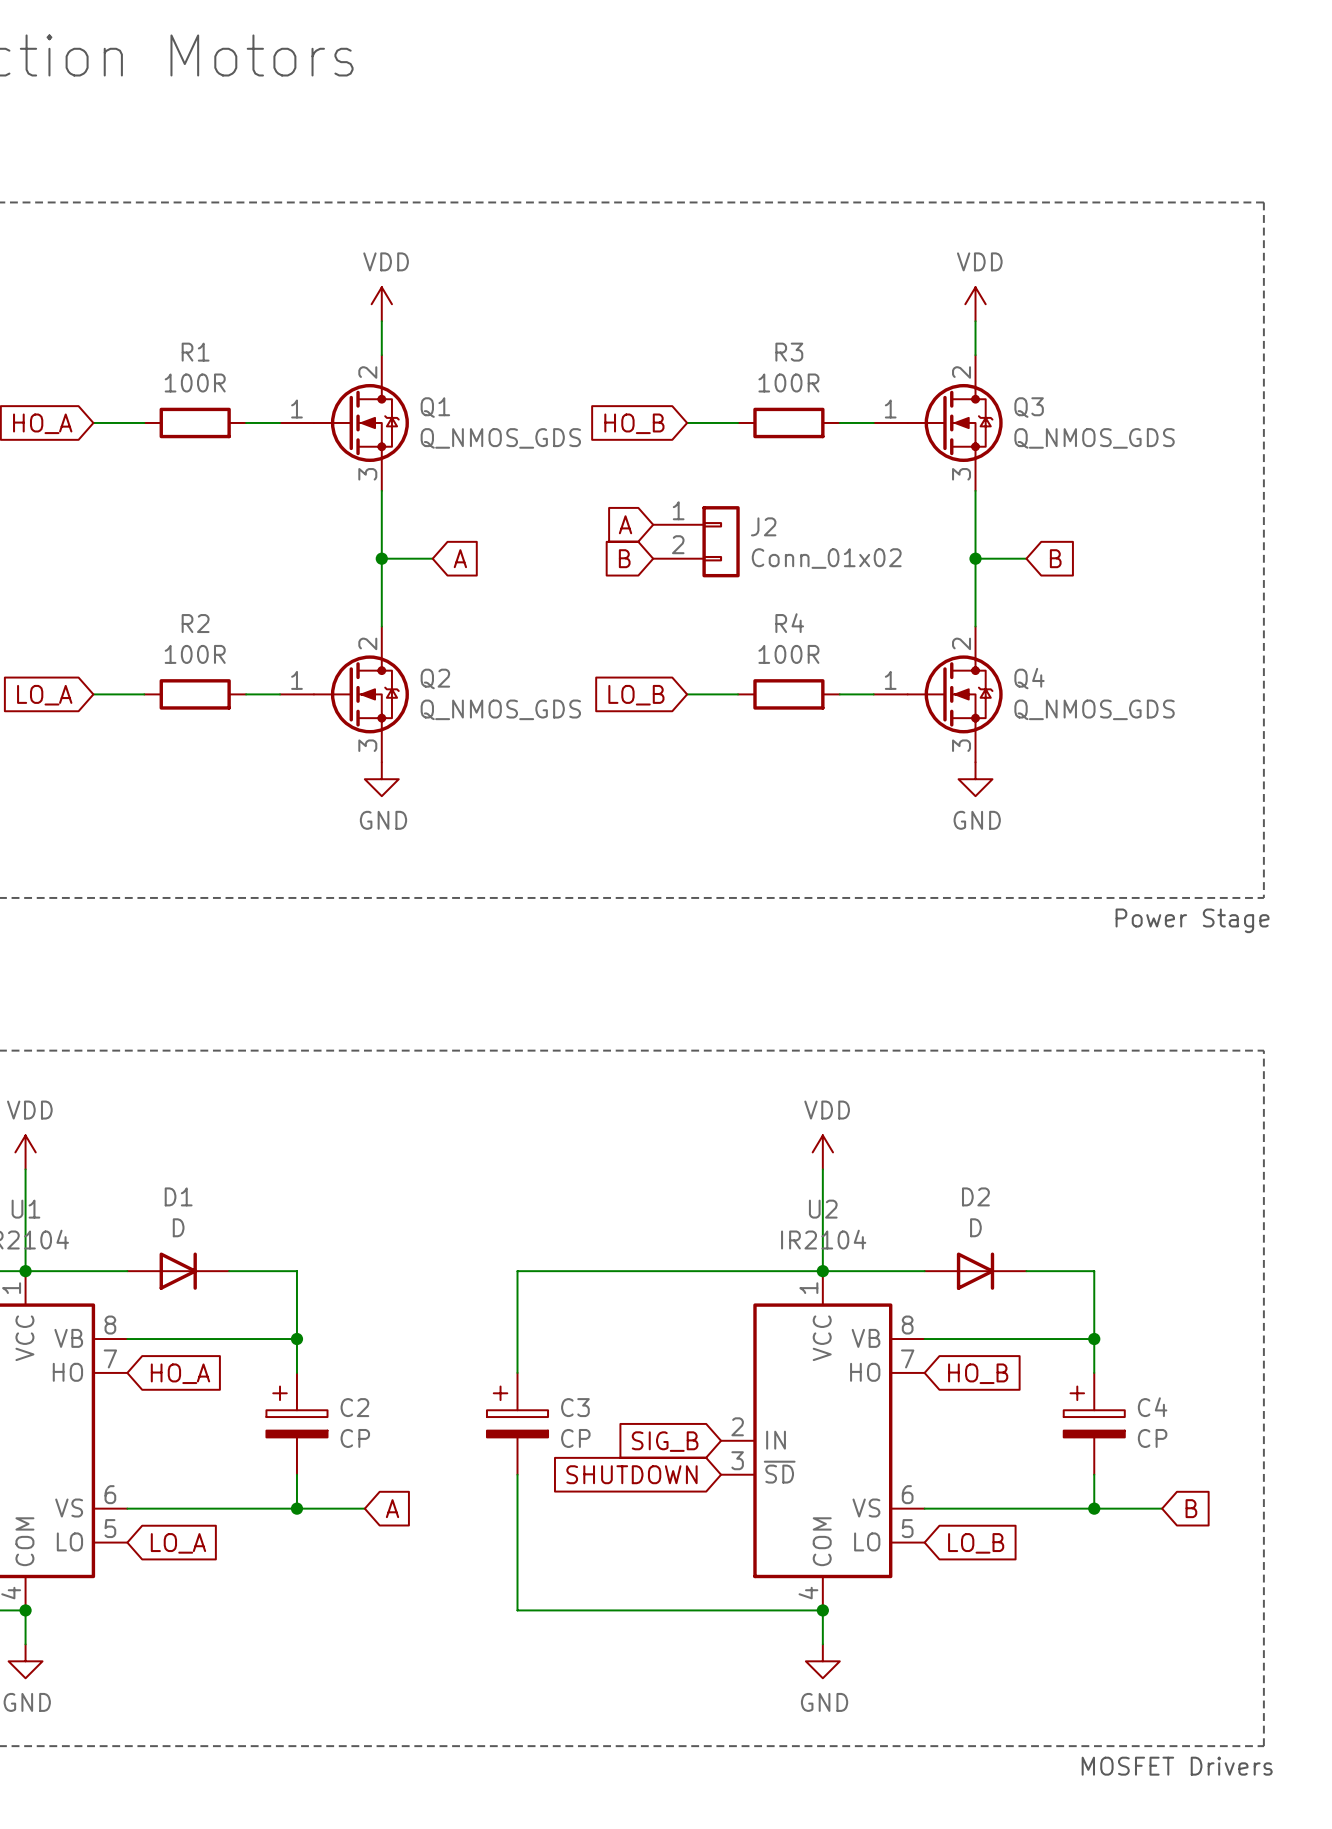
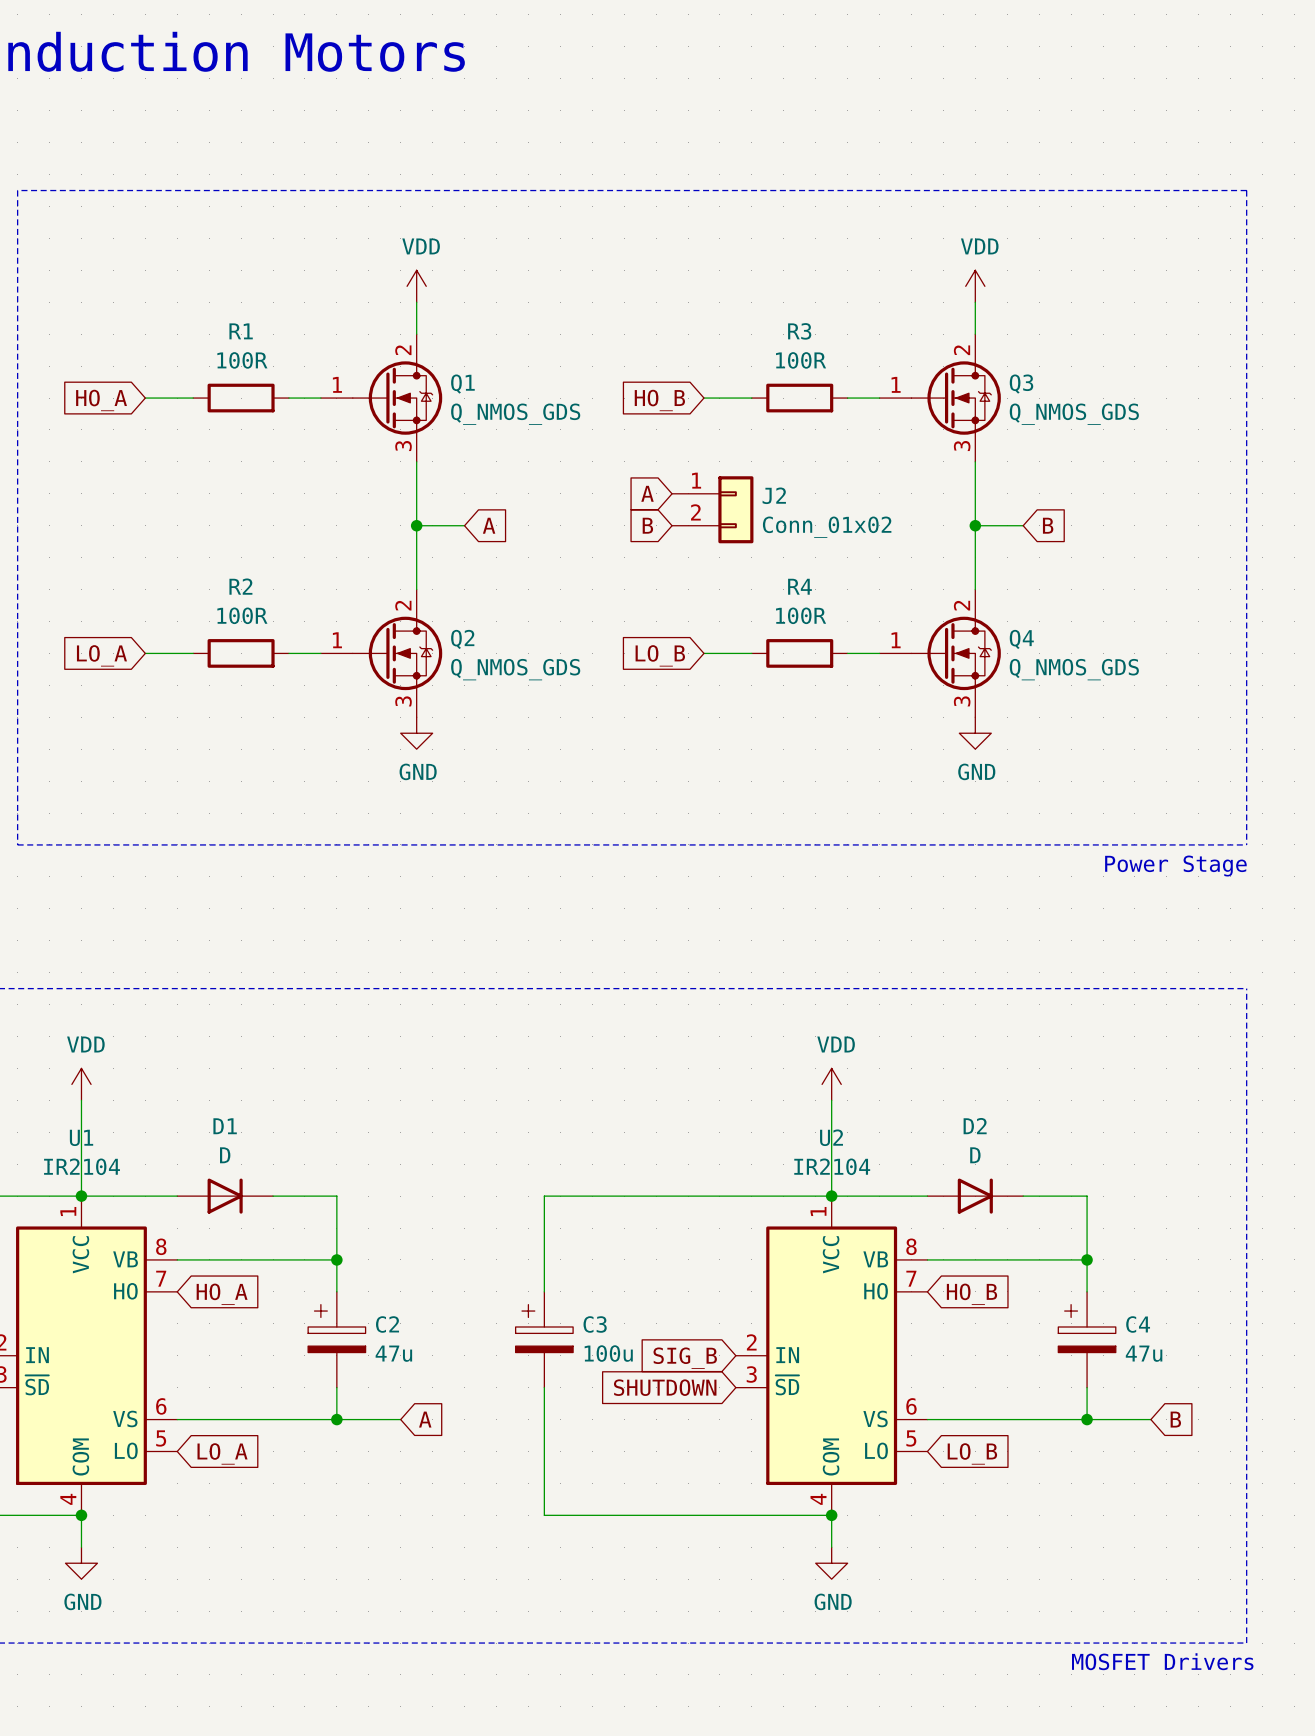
C2 value: CP (355, 1438) -> 47u (393, 1353)
C3 value: CP (575, 1438) -> 100u (608, 1353)
C4 value: CP (1152, 1438) -> 47u (1144, 1353)

